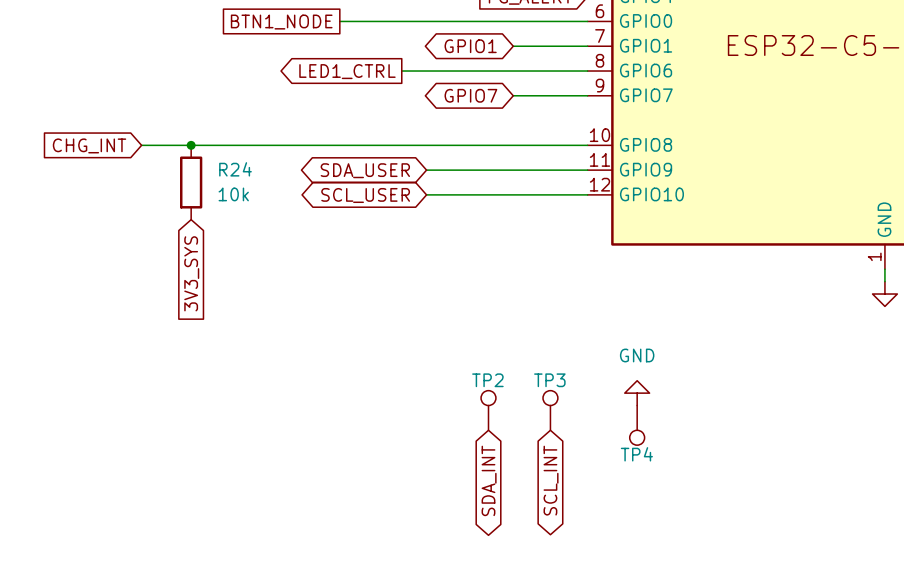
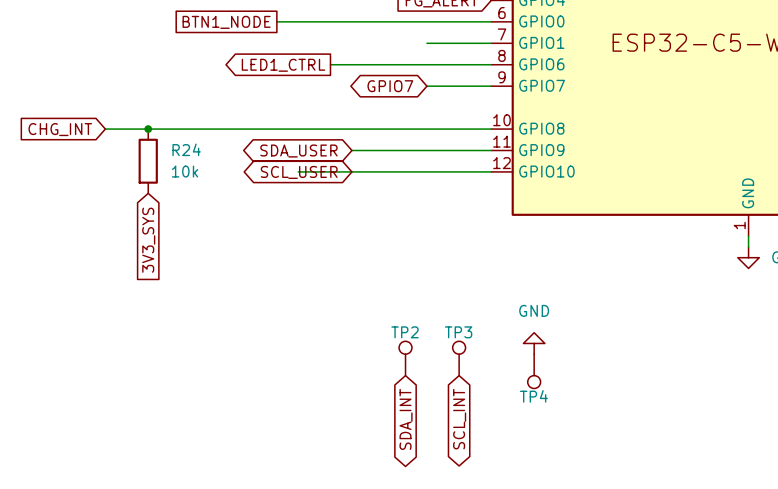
global label: GPIO1 (470, 46) -> none
wire: none -> (298, 171) (351, 171)

